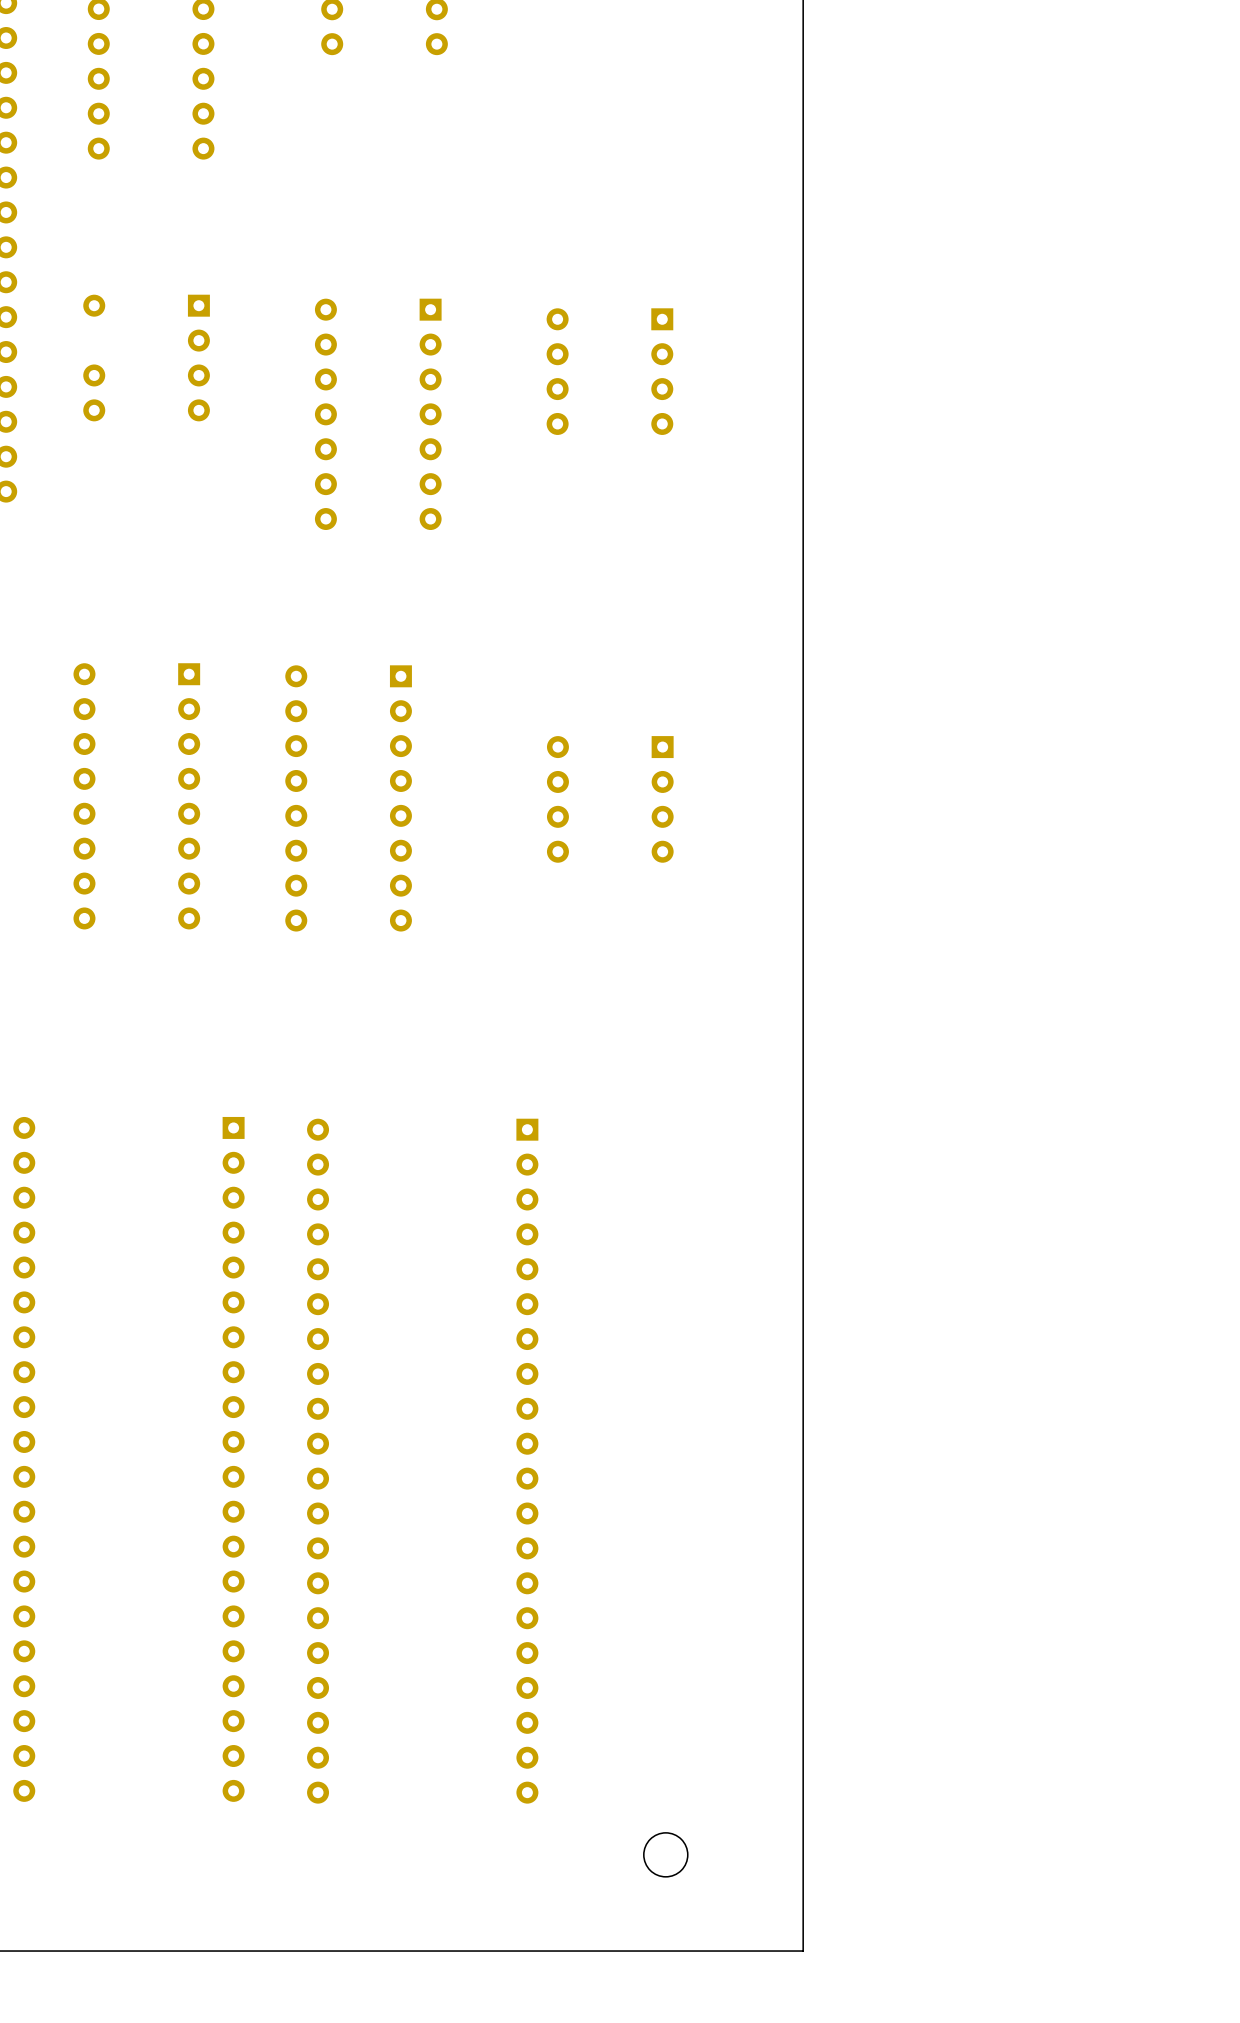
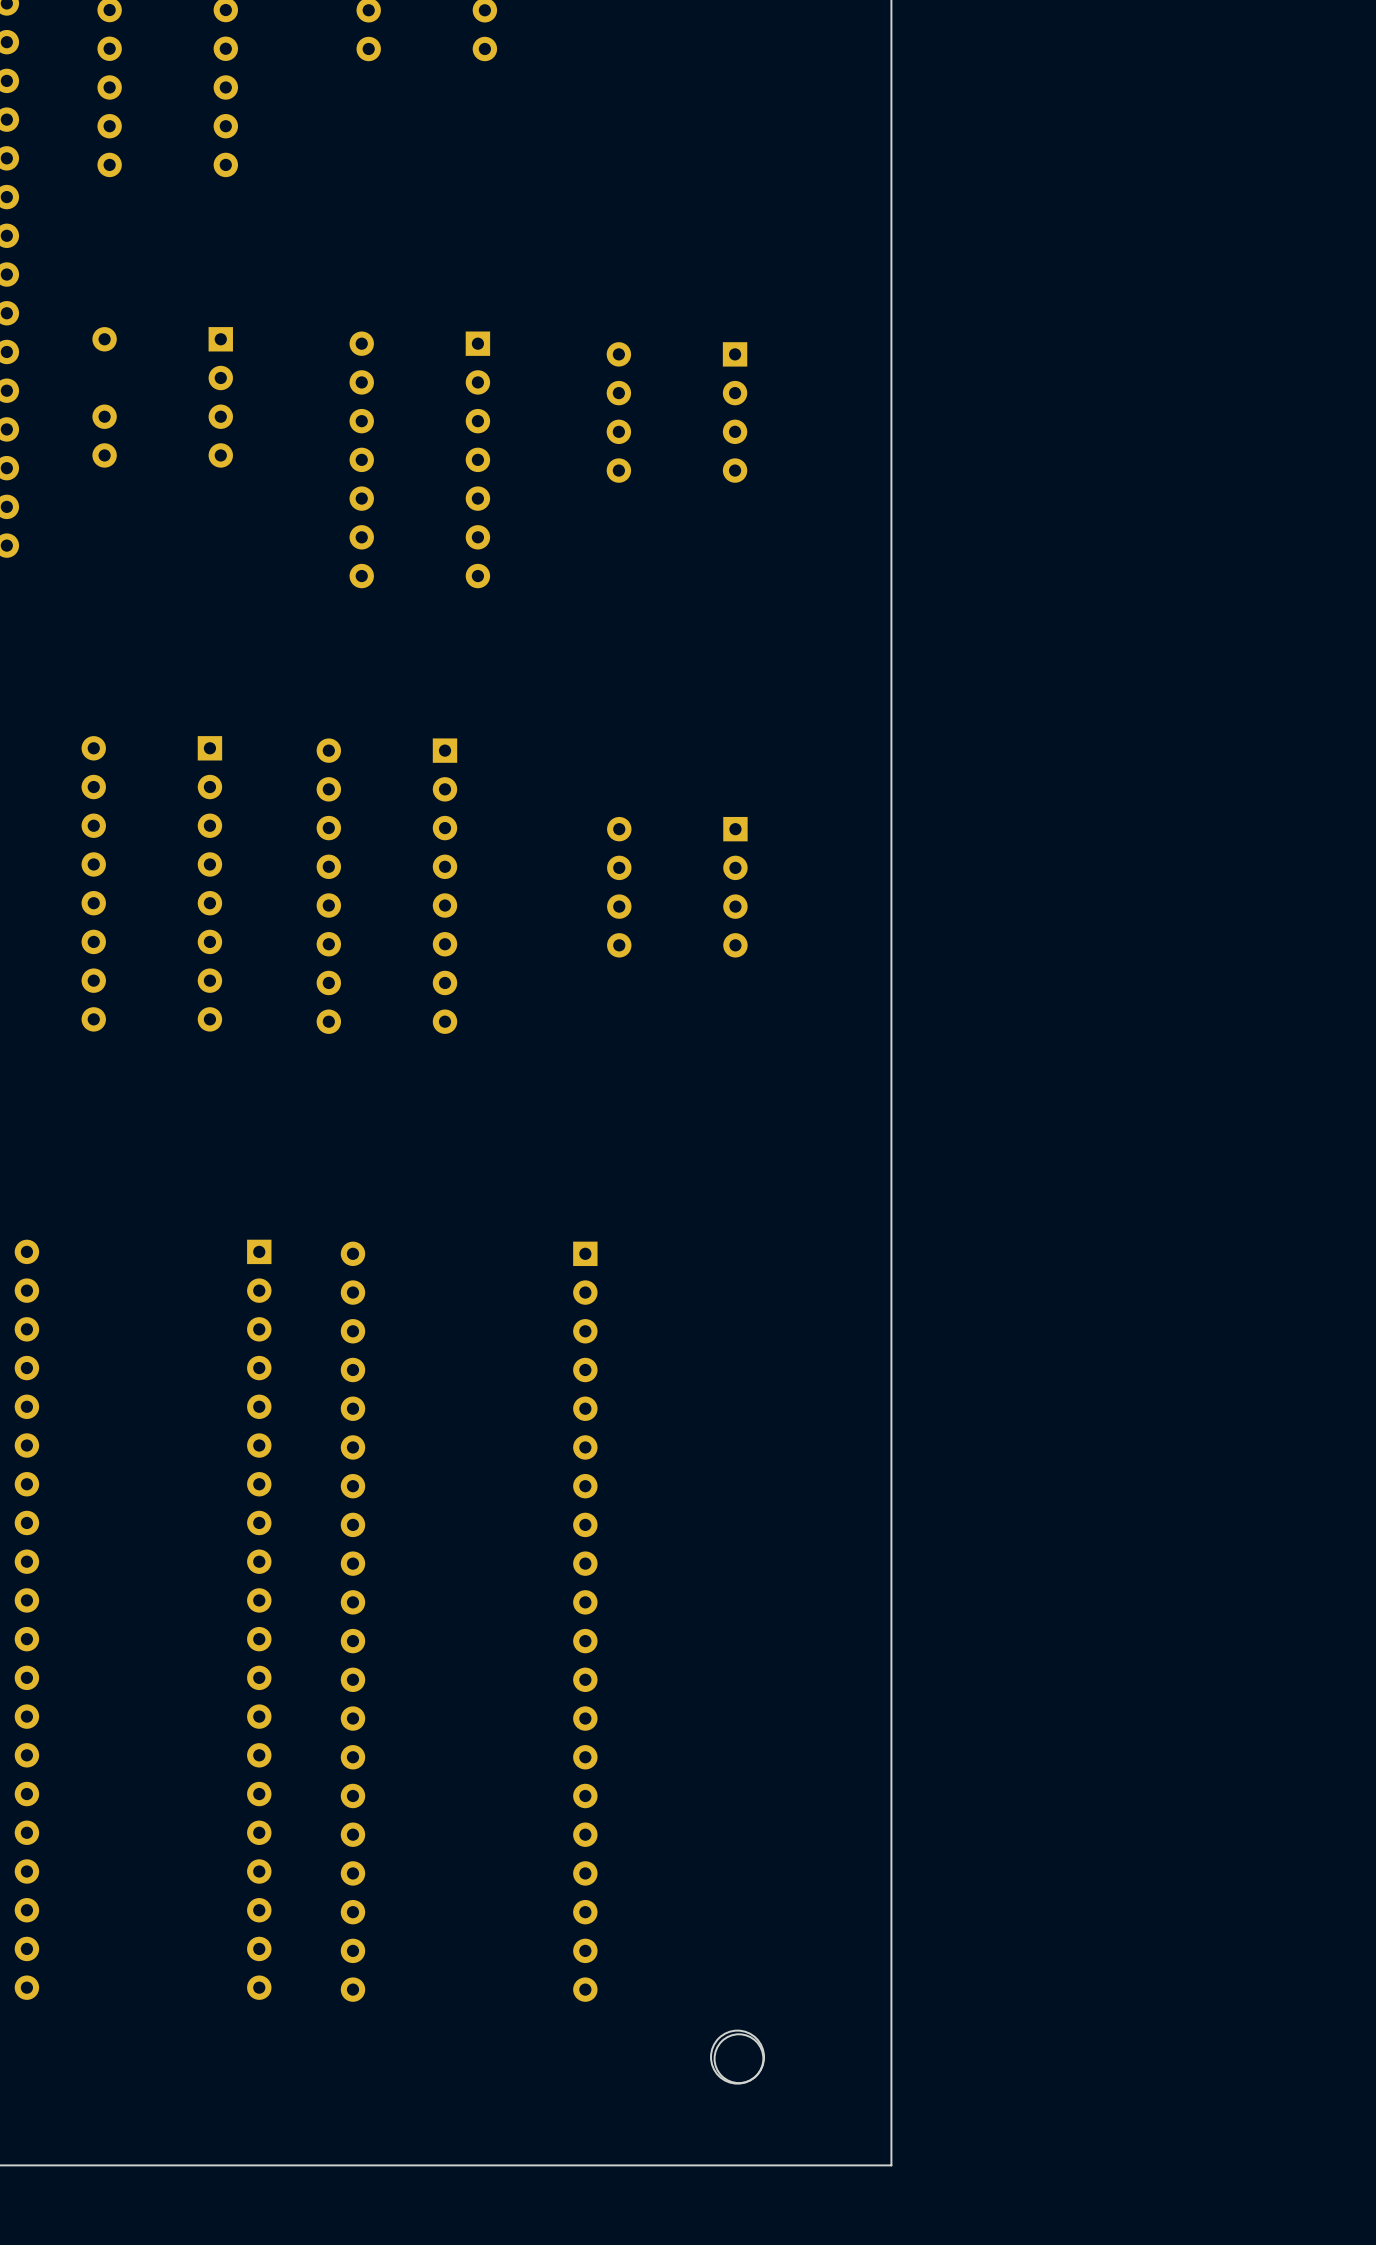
round board edge: none -> [710, 2029, 765, 2085]

